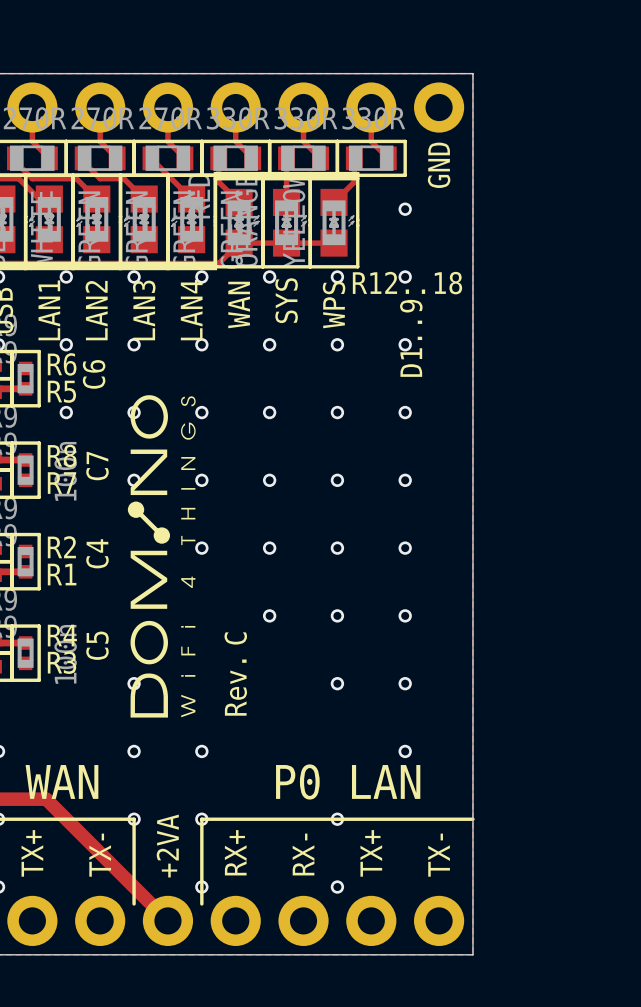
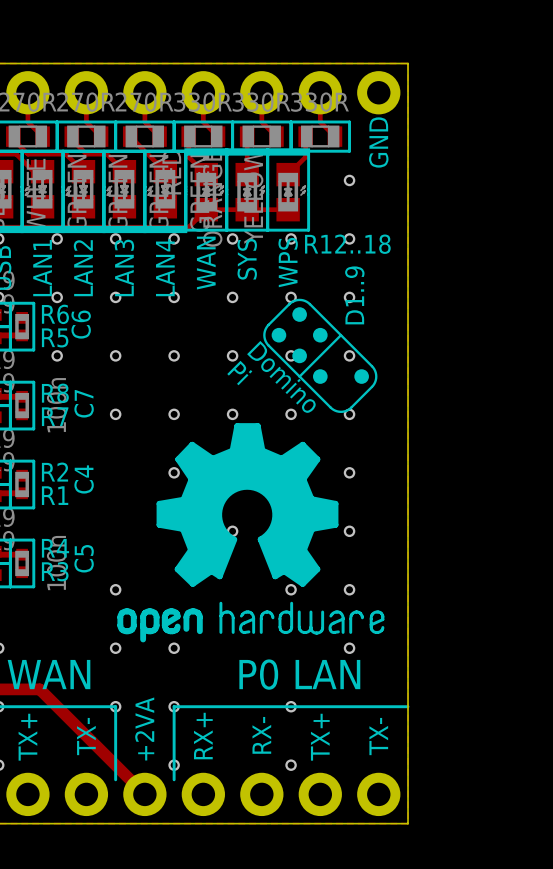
drawing: none -> [117, 298, 385, 643]
drawing: [127, 395, 196, 718] -> none
text: C (235, 638) -> none
text: Rev. (235, 687) -> none

